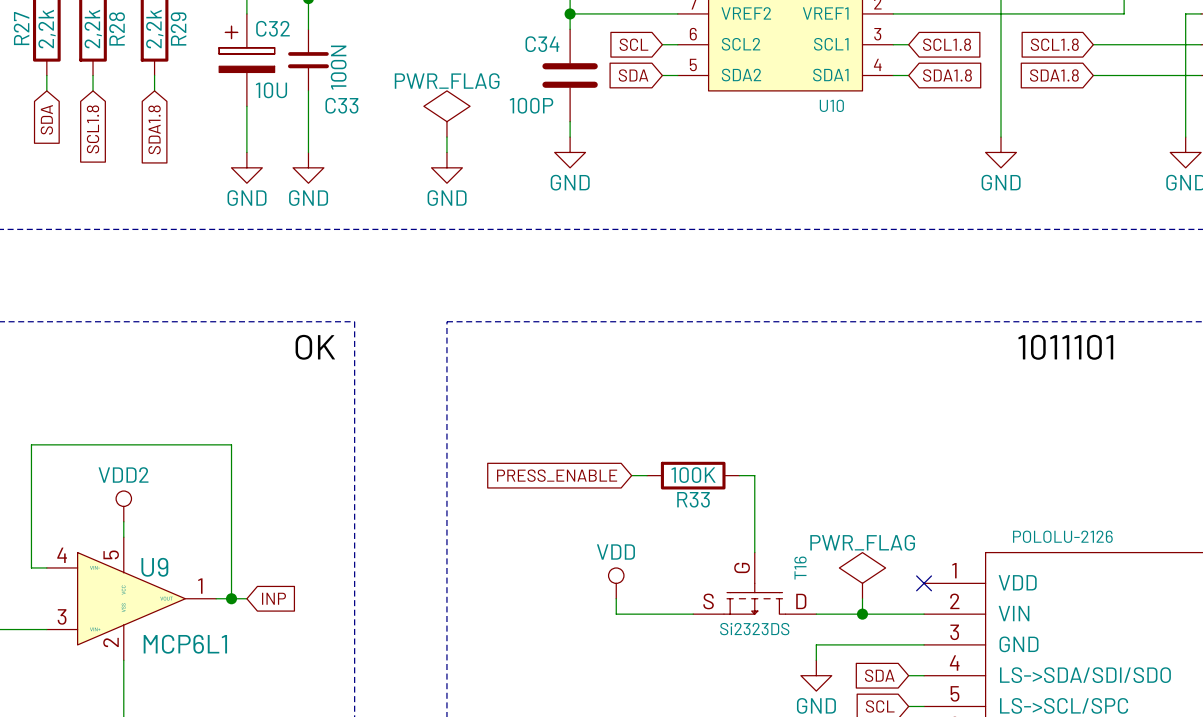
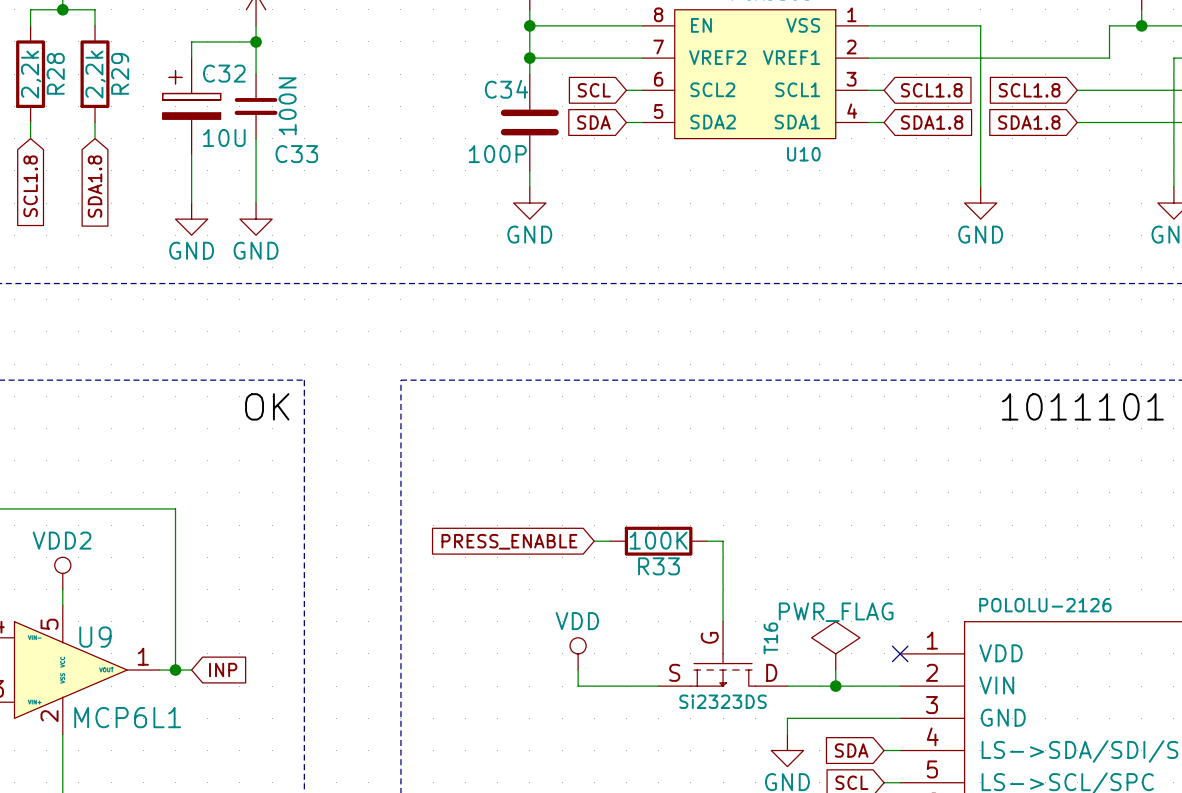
power symbol: PWR_FLAG (446, 113) -> none
wire: (446, 137) (446, 152) -> none
power symbol: GND (446, 167) -> none

